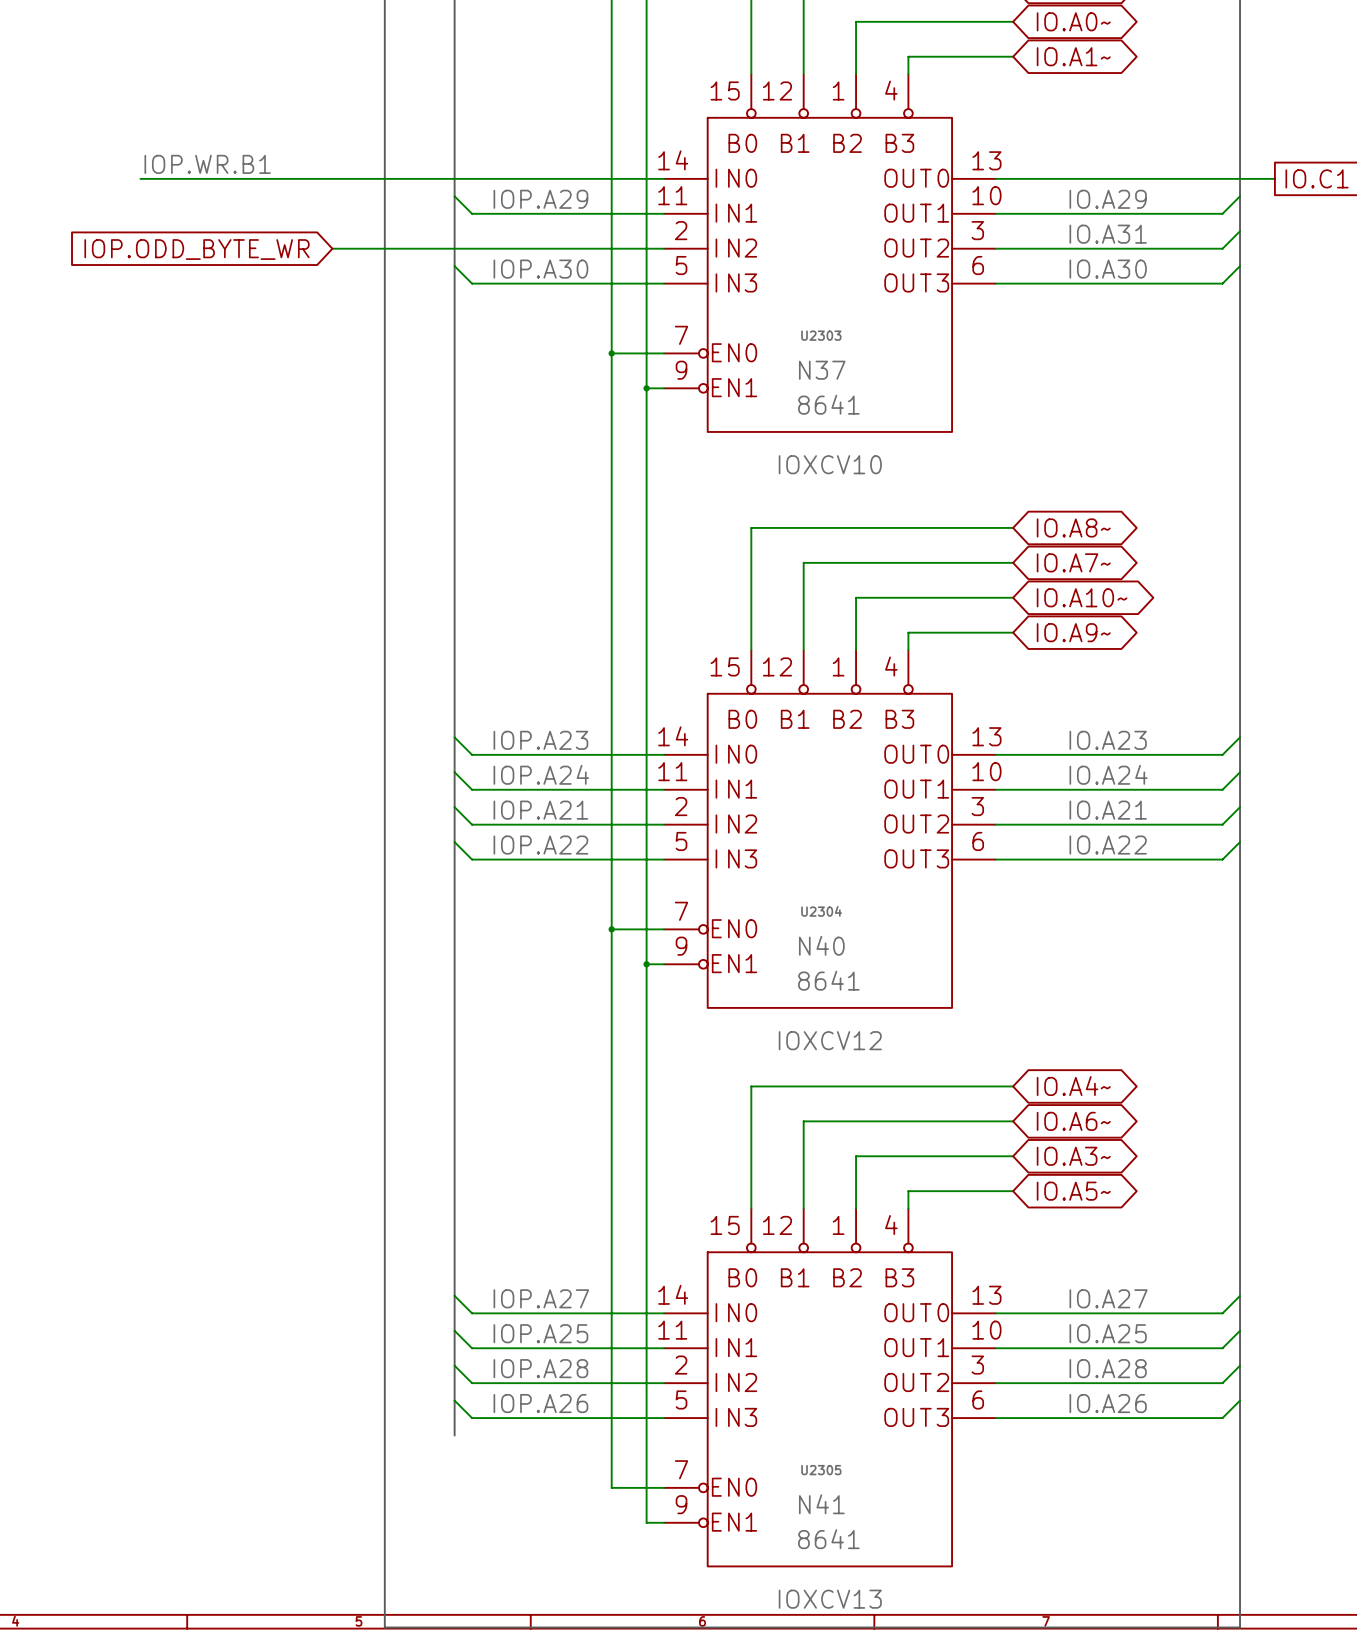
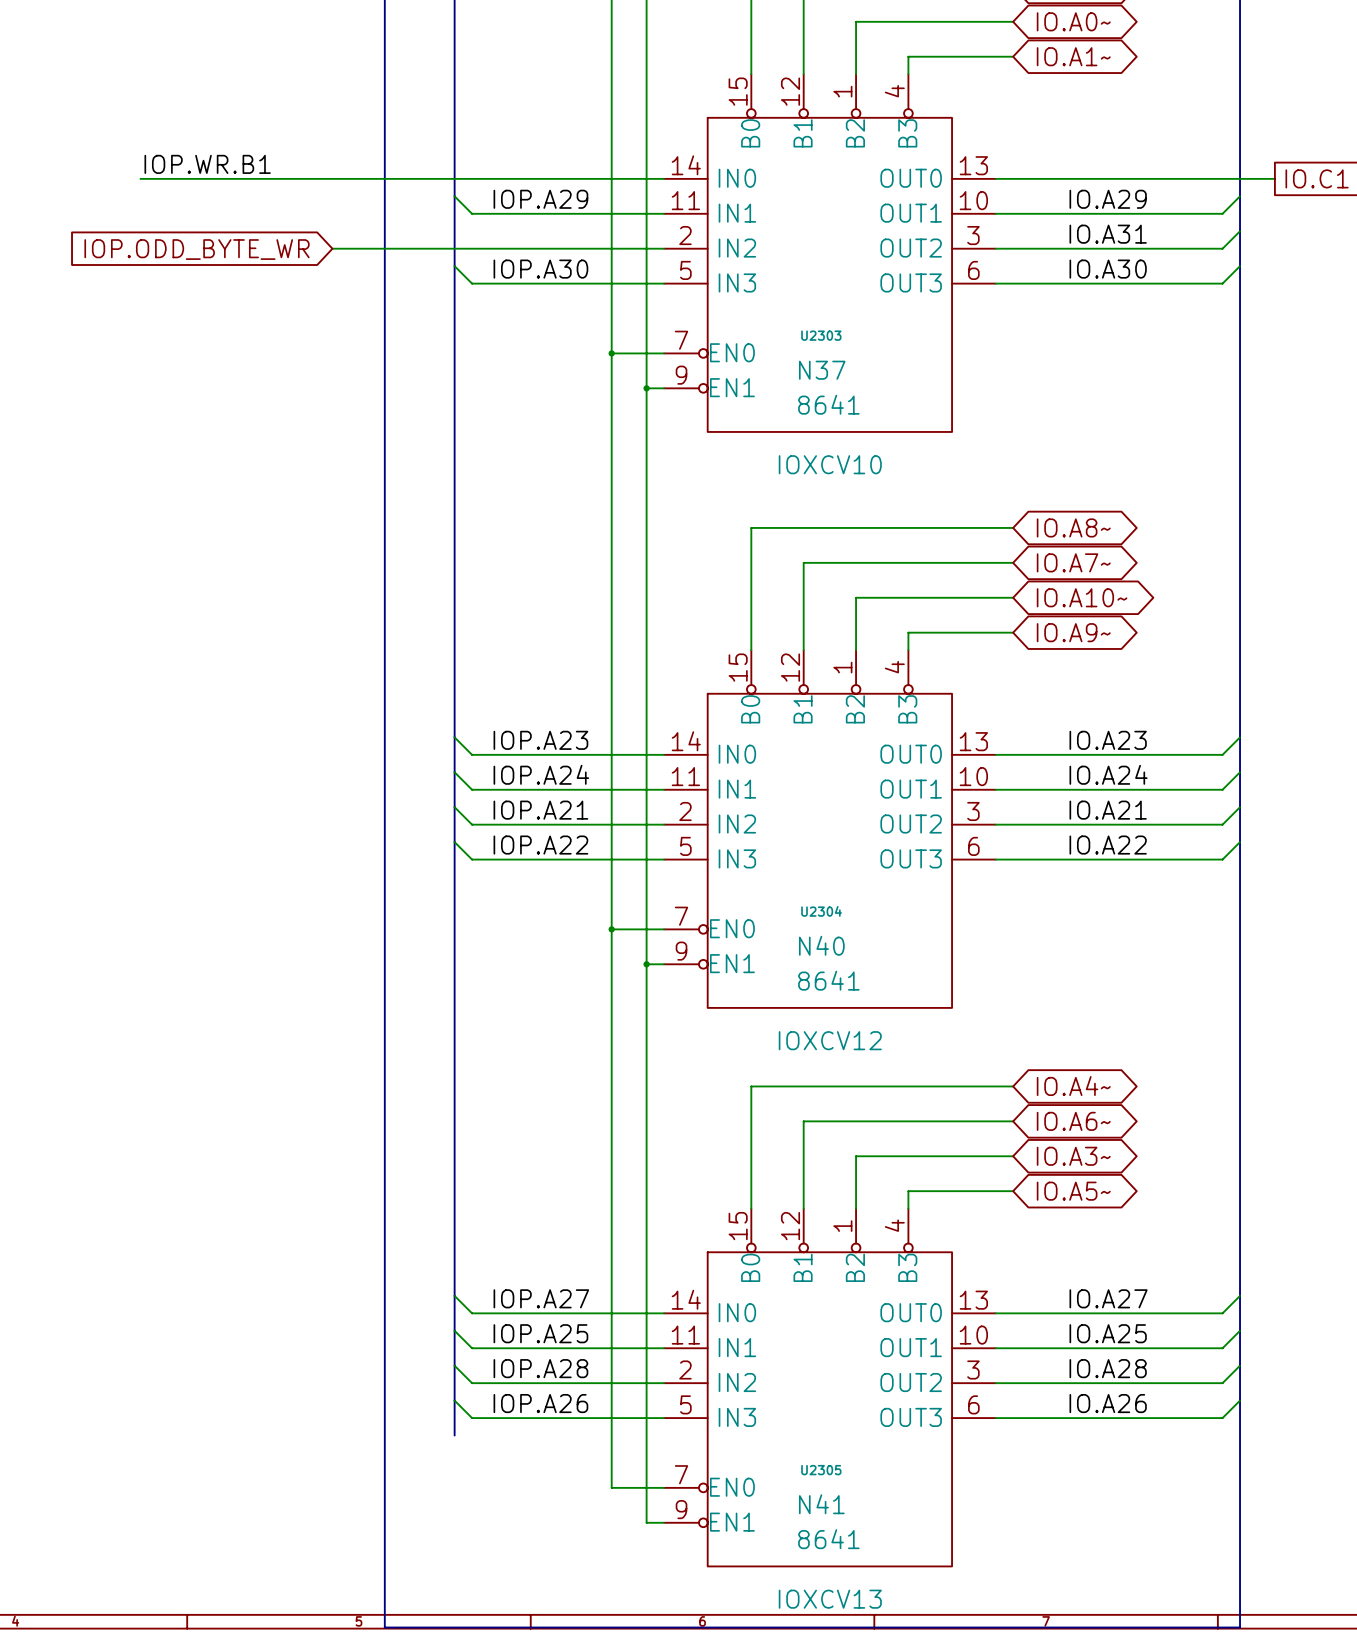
U2303 symbol: [664, 74, 996, 432] -> [664, 74, 996, 432]
U2304 symbol: [664, 650, 996, 1008] -> [664, 650, 996, 1008]
U2305 symbol: [664, 1208, 996, 1567] -> [664, 1208, 996, 1567]

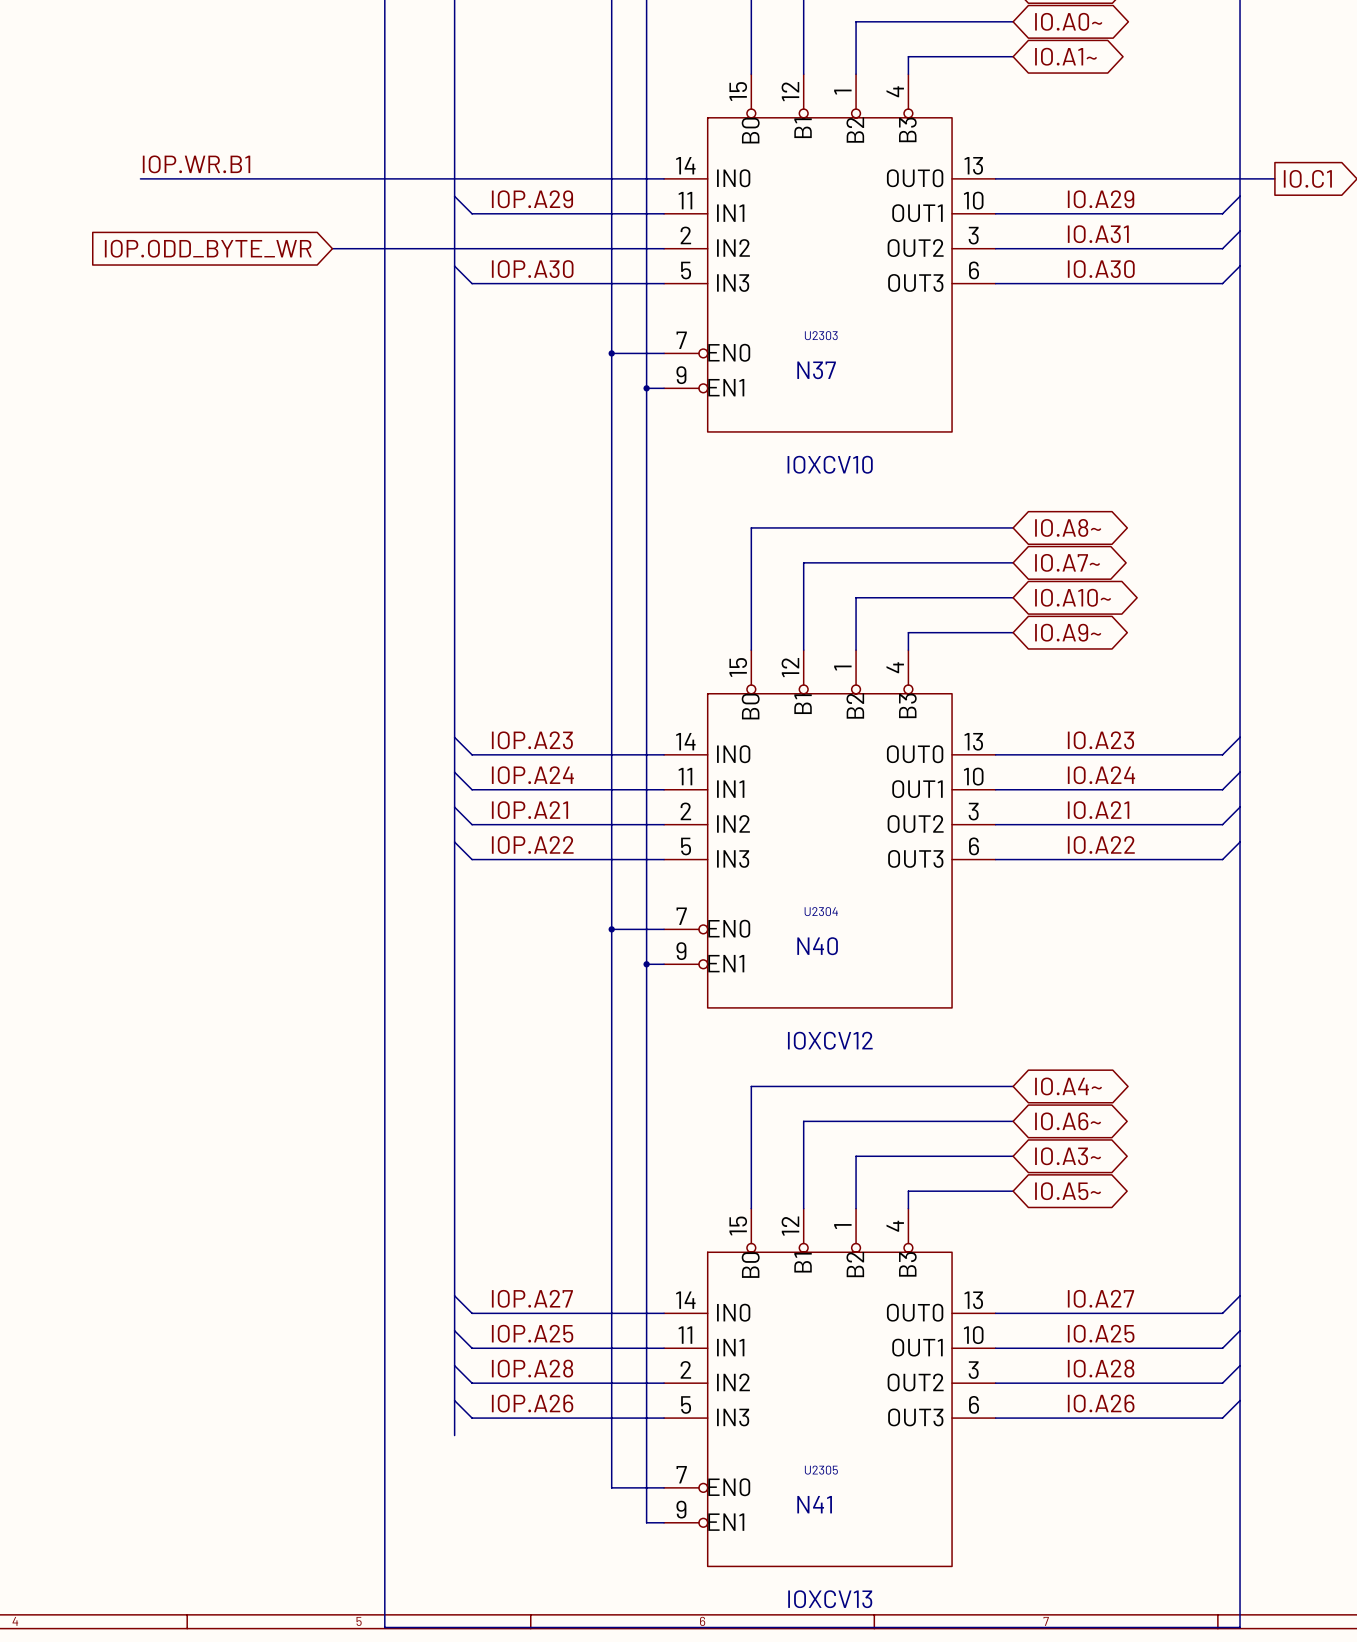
U2303 value: 8641 (828, 404) -> none
U2304 value: 8641 (828, 980) -> none
U2305 value: 8641 (828, 1539) -> none

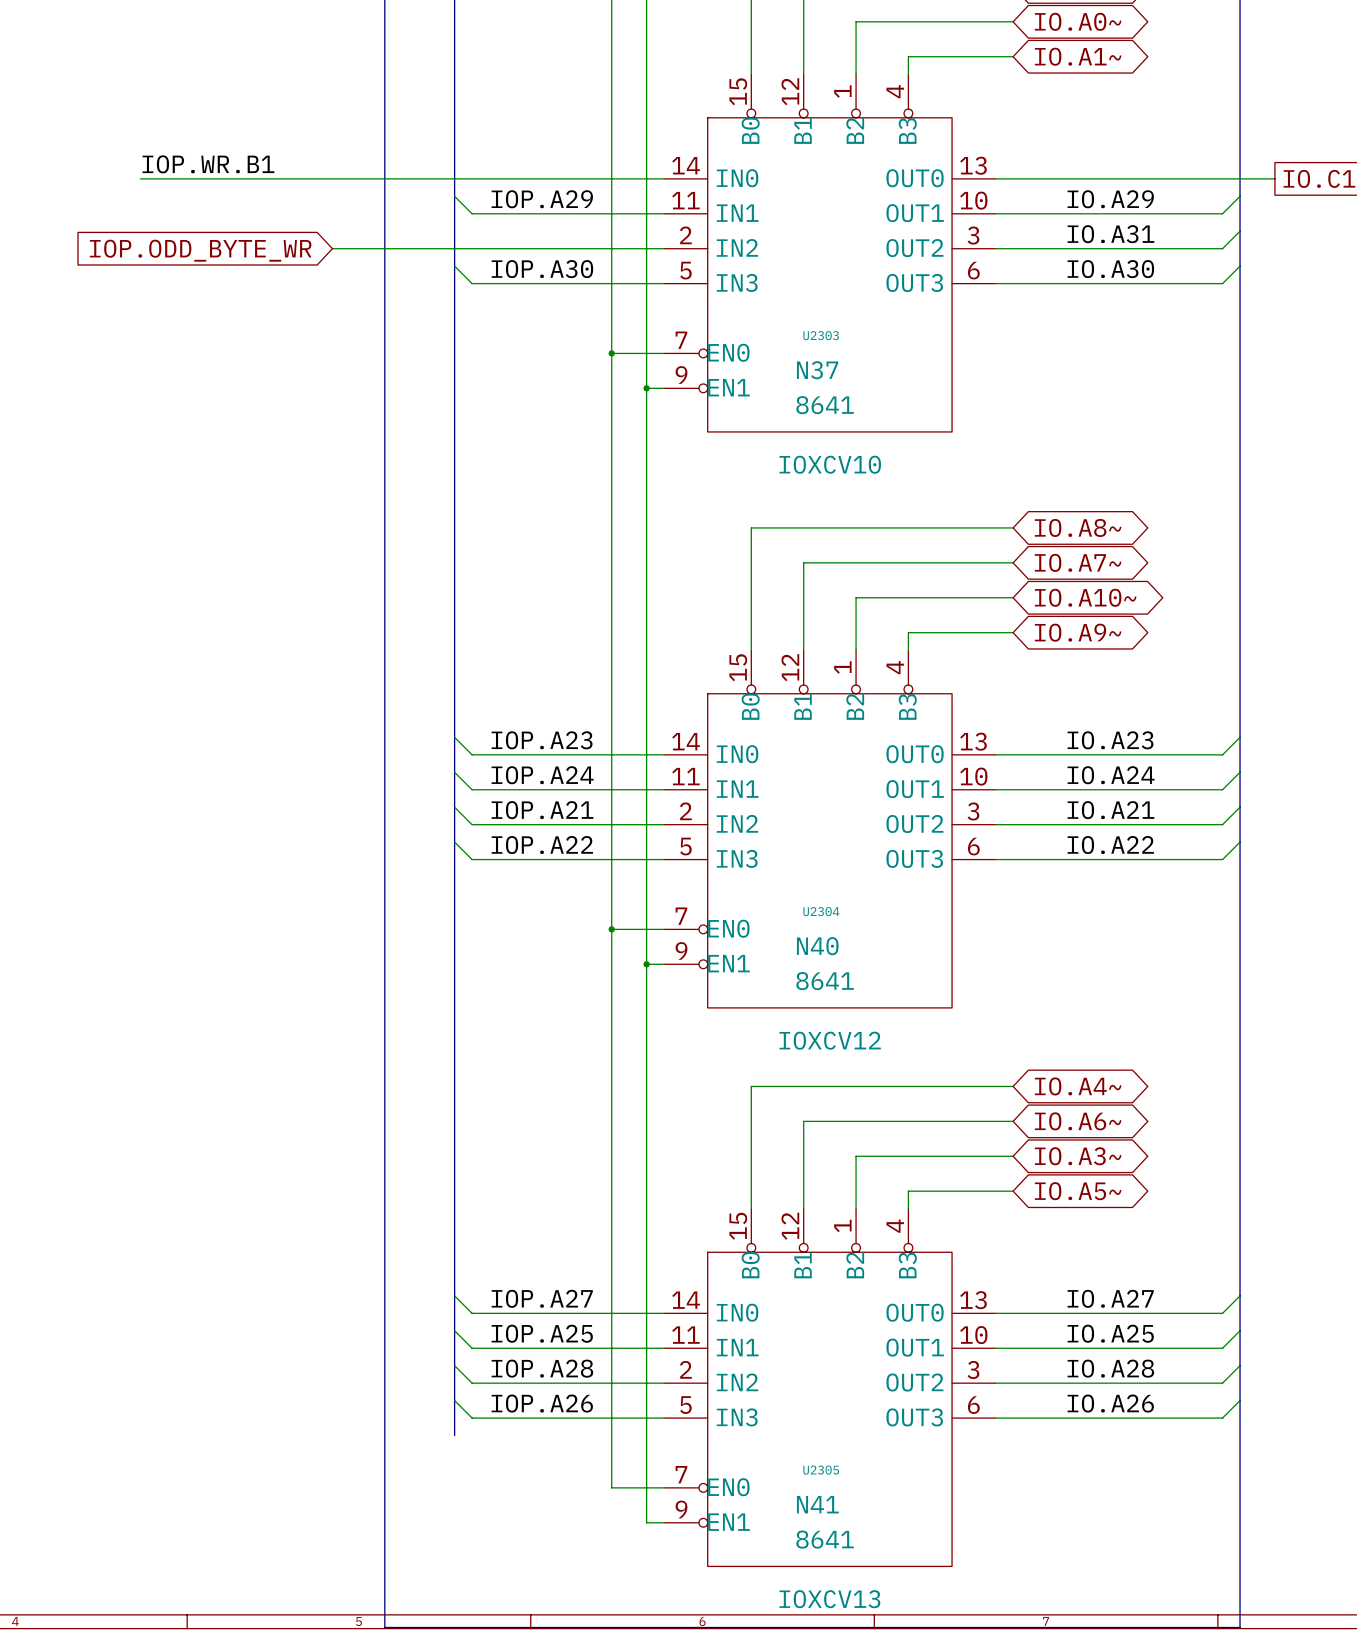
U2303 value: none -> 8641 (825, 405)
U2304 value: none -> 8641 (825, 981)
U2305 value: none -> 8641 (825, 1539)

